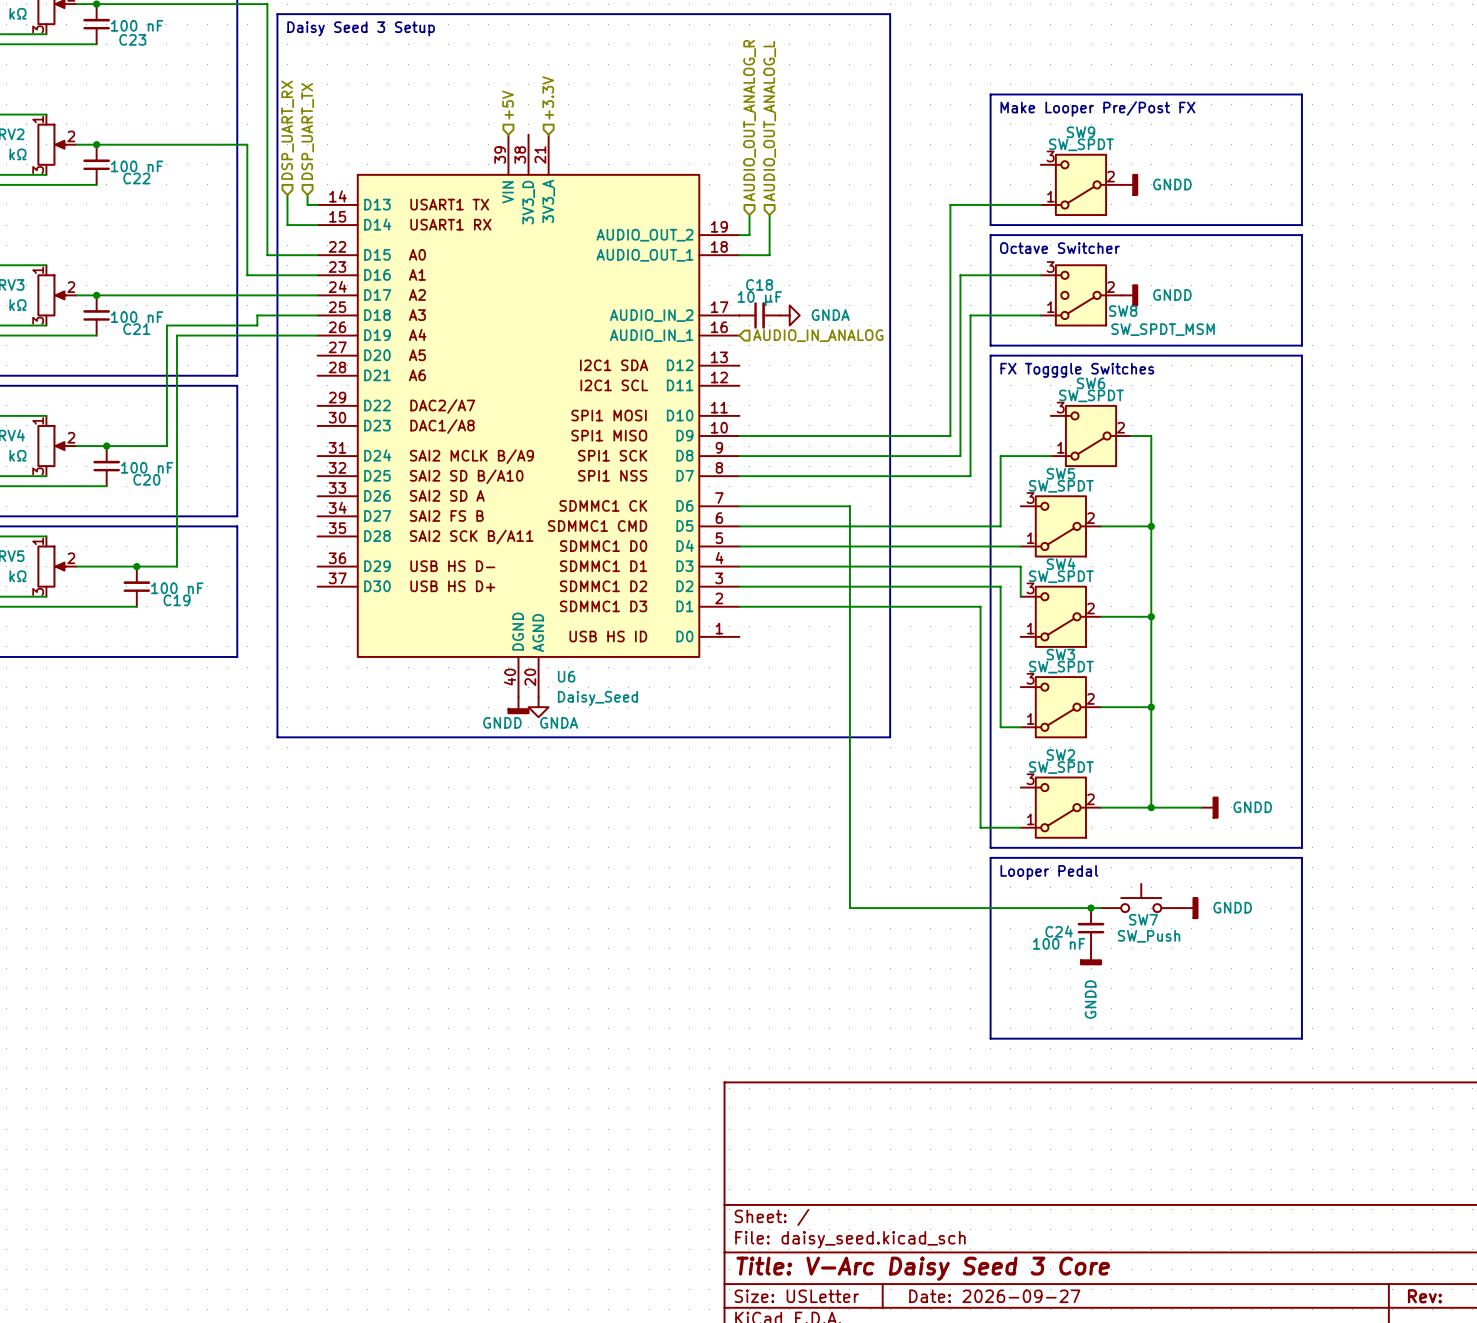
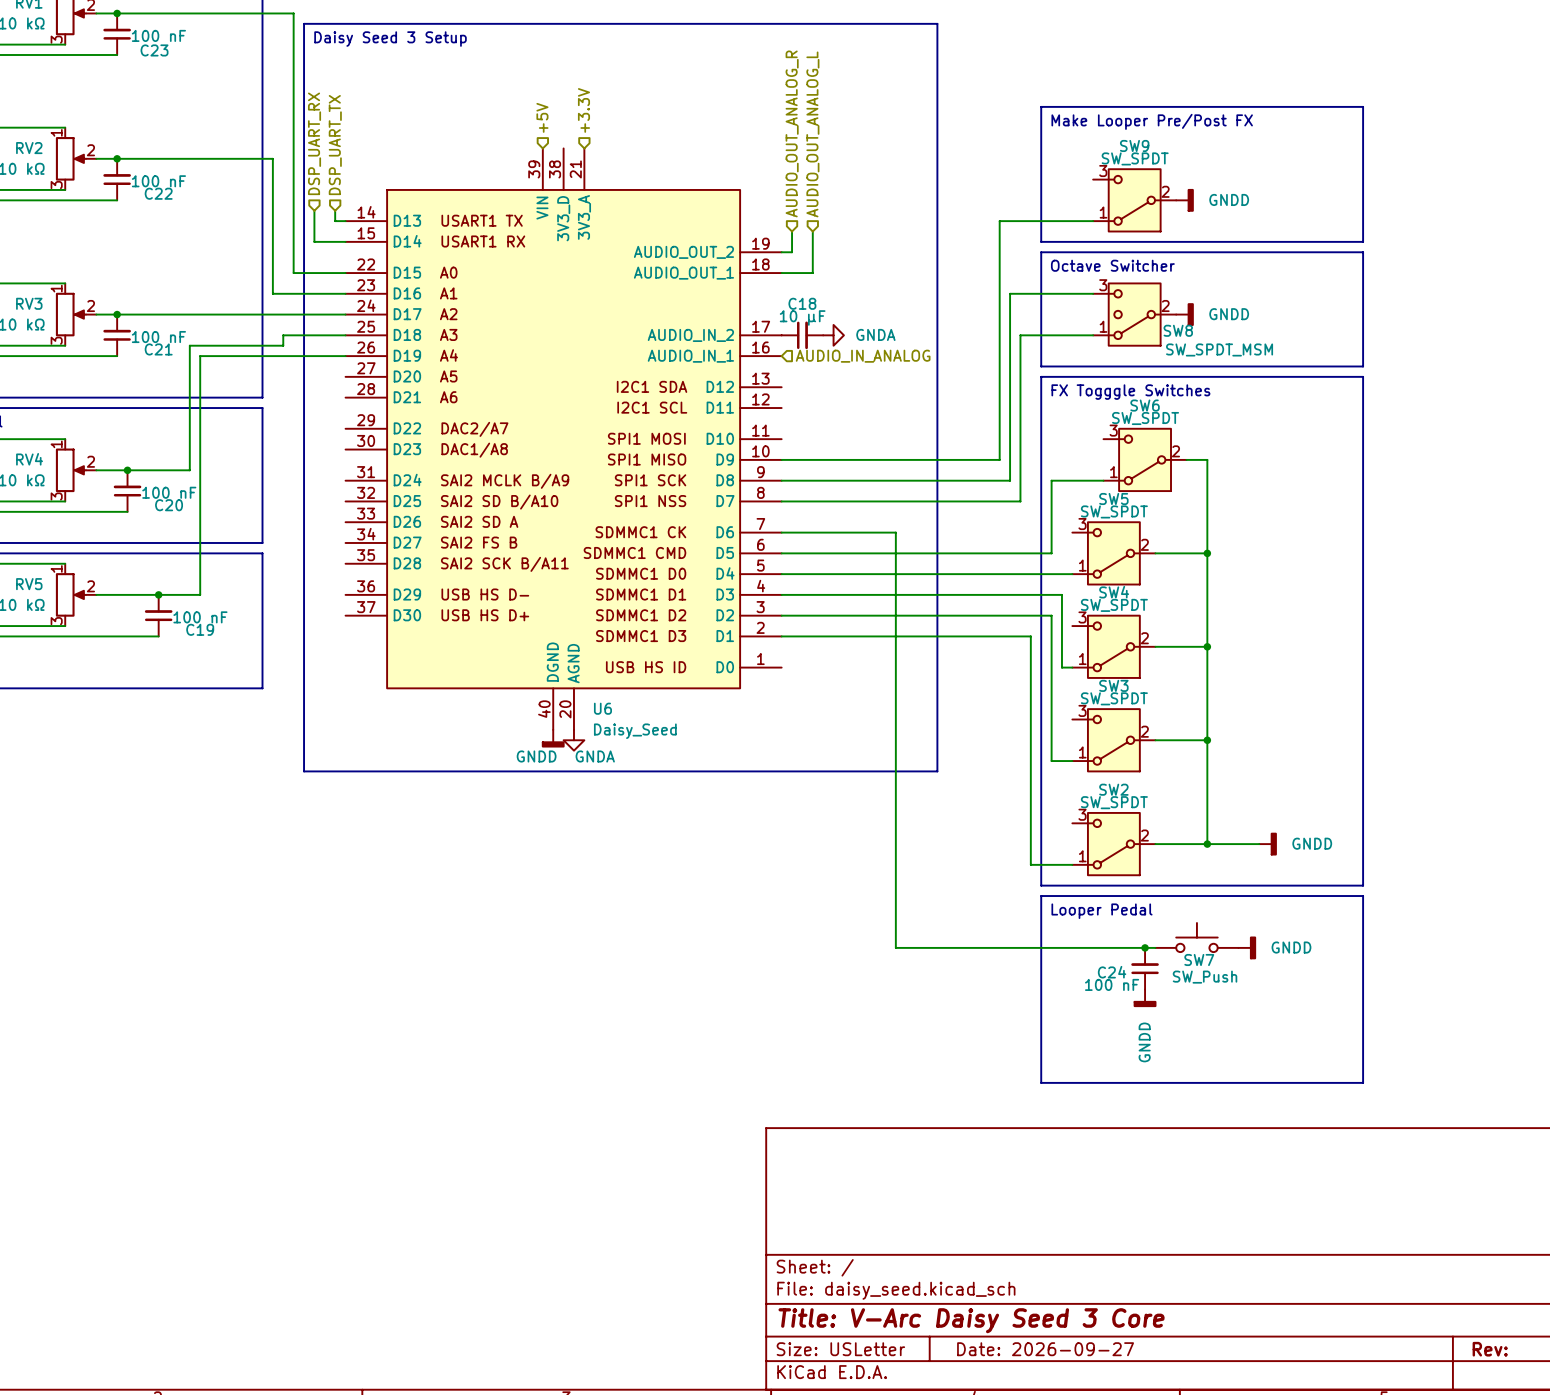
wire: (1010, 566) (1020, 566) (1020, 596) -> (1061, 594) (1061, 667) (1072, 667)

